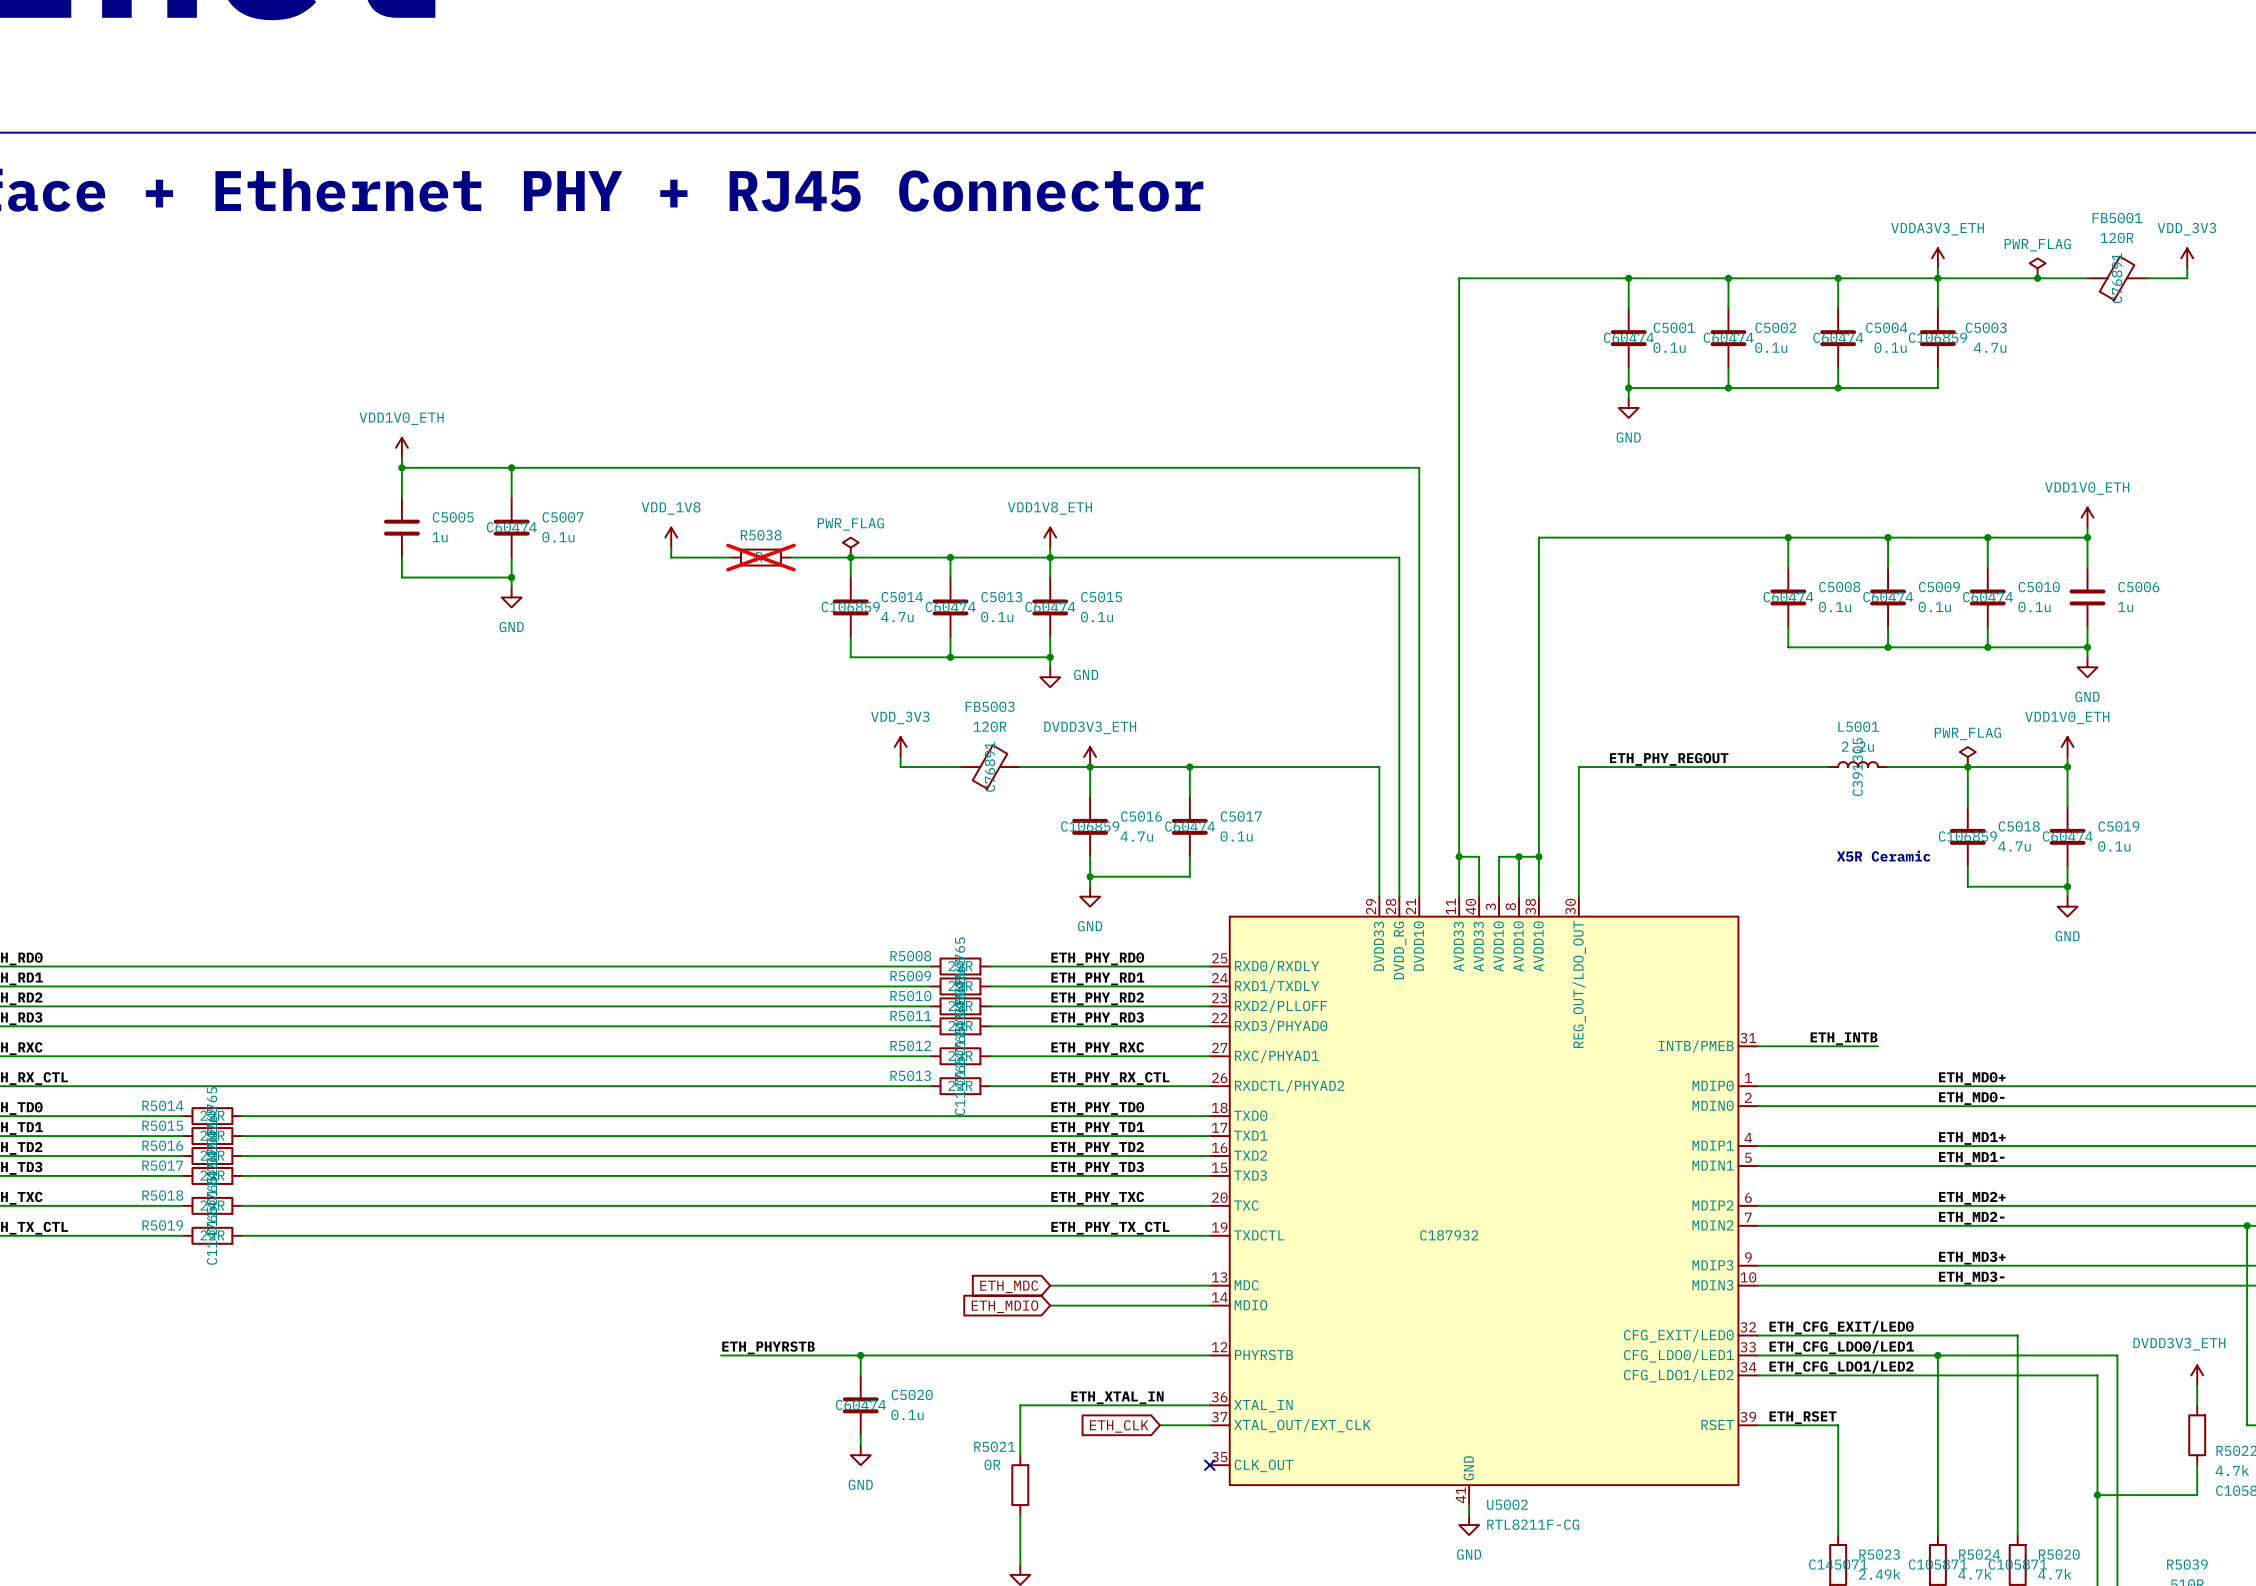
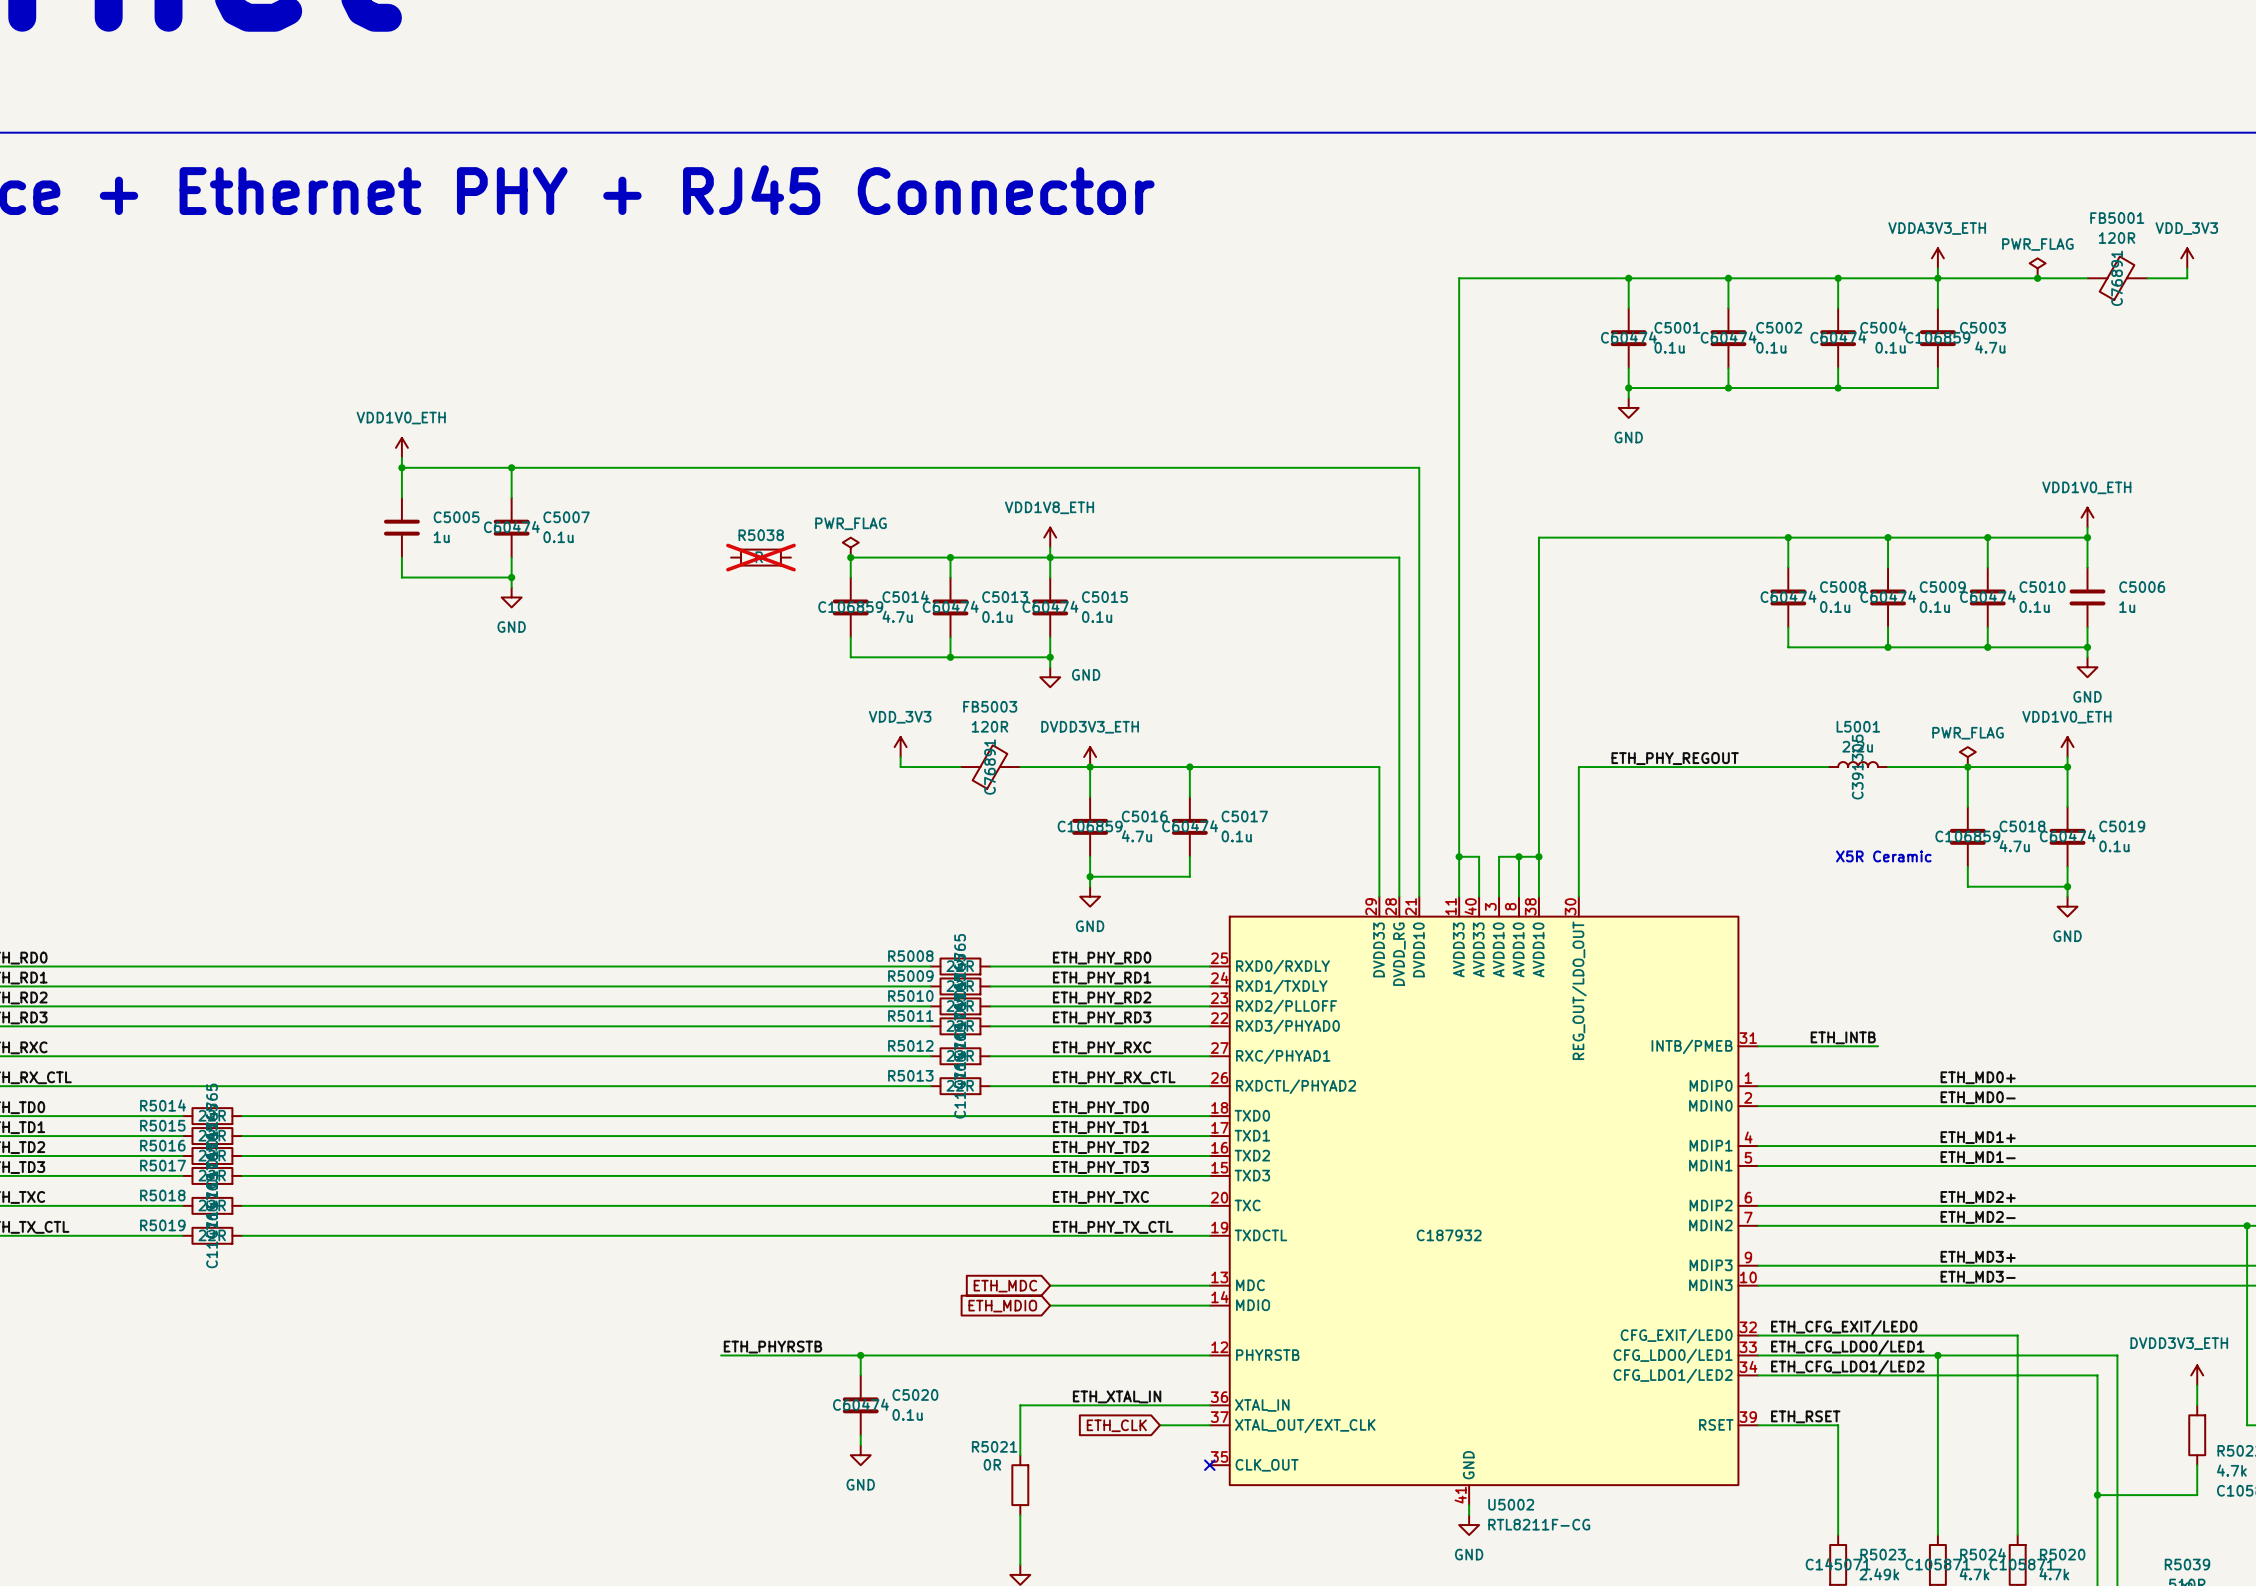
power symbol: VDD_1V8 (671, 537) -> none
wire: (671, 547) (671, 557) (731, 557) -> none
wire: (790, 557) (850, 557) -> none

